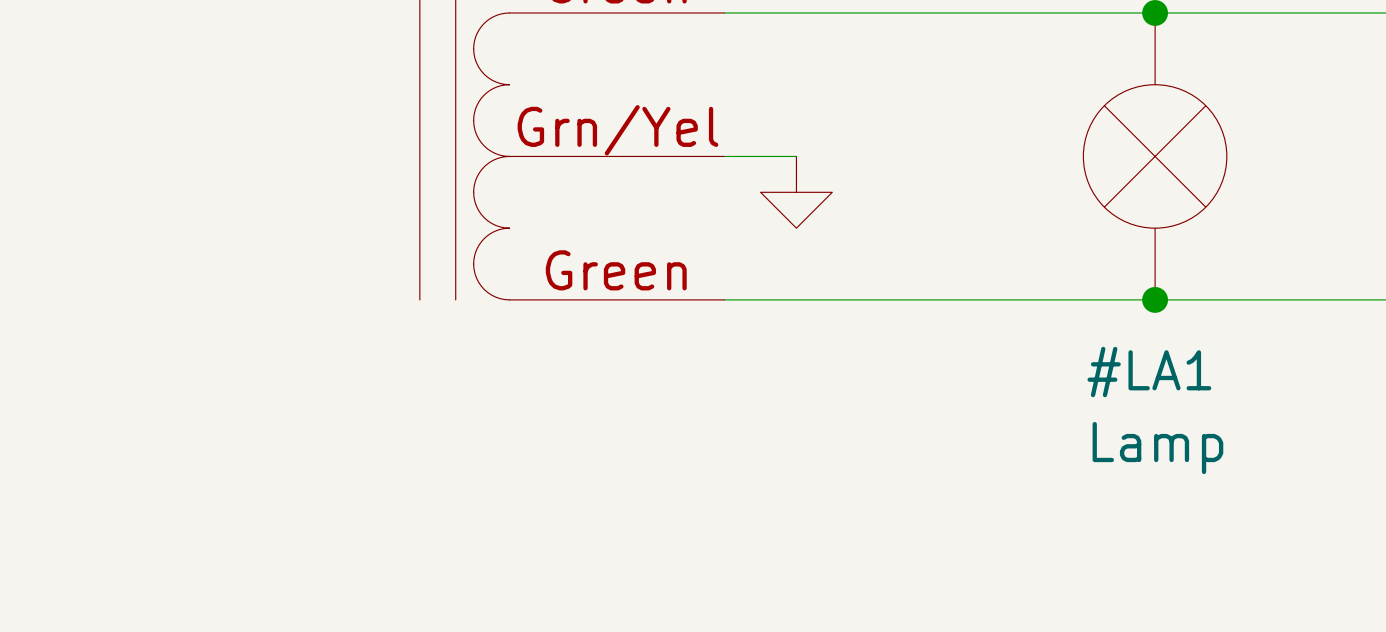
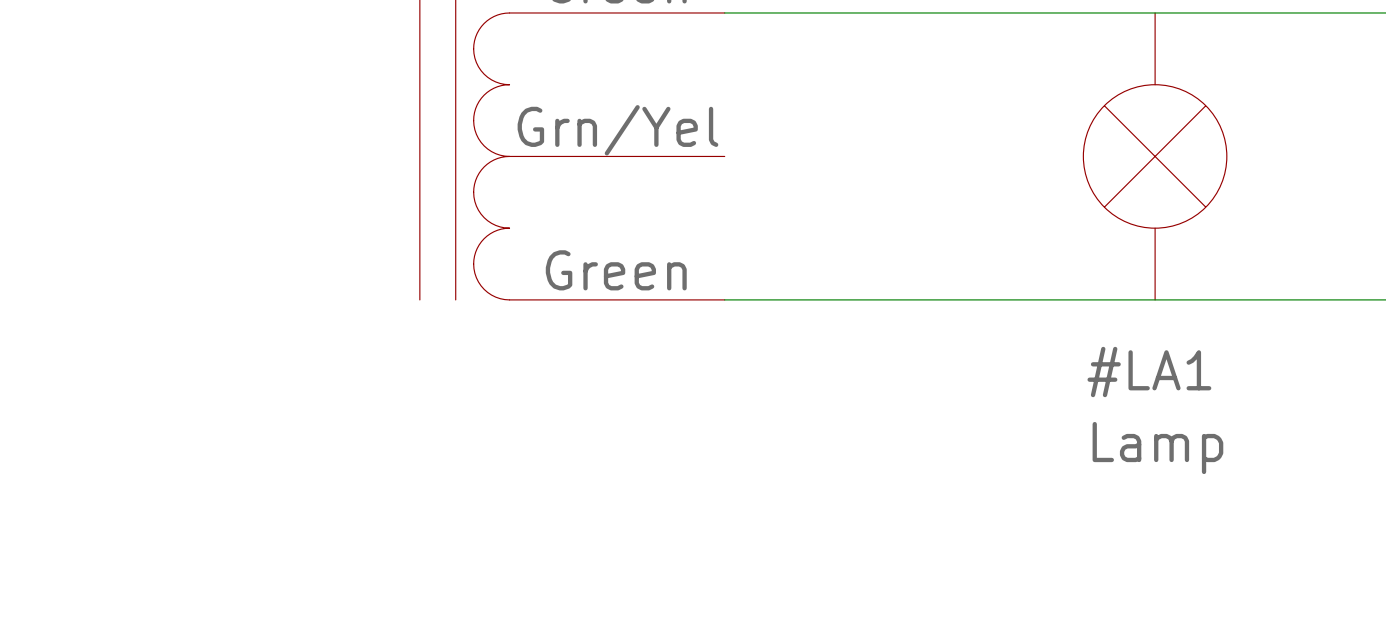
junction: (1155, 12) -> none
wire: (724, 156) (796, 156) -> none
power symbol: (796, 192) -> none
junction: (1155, 299) -> none

